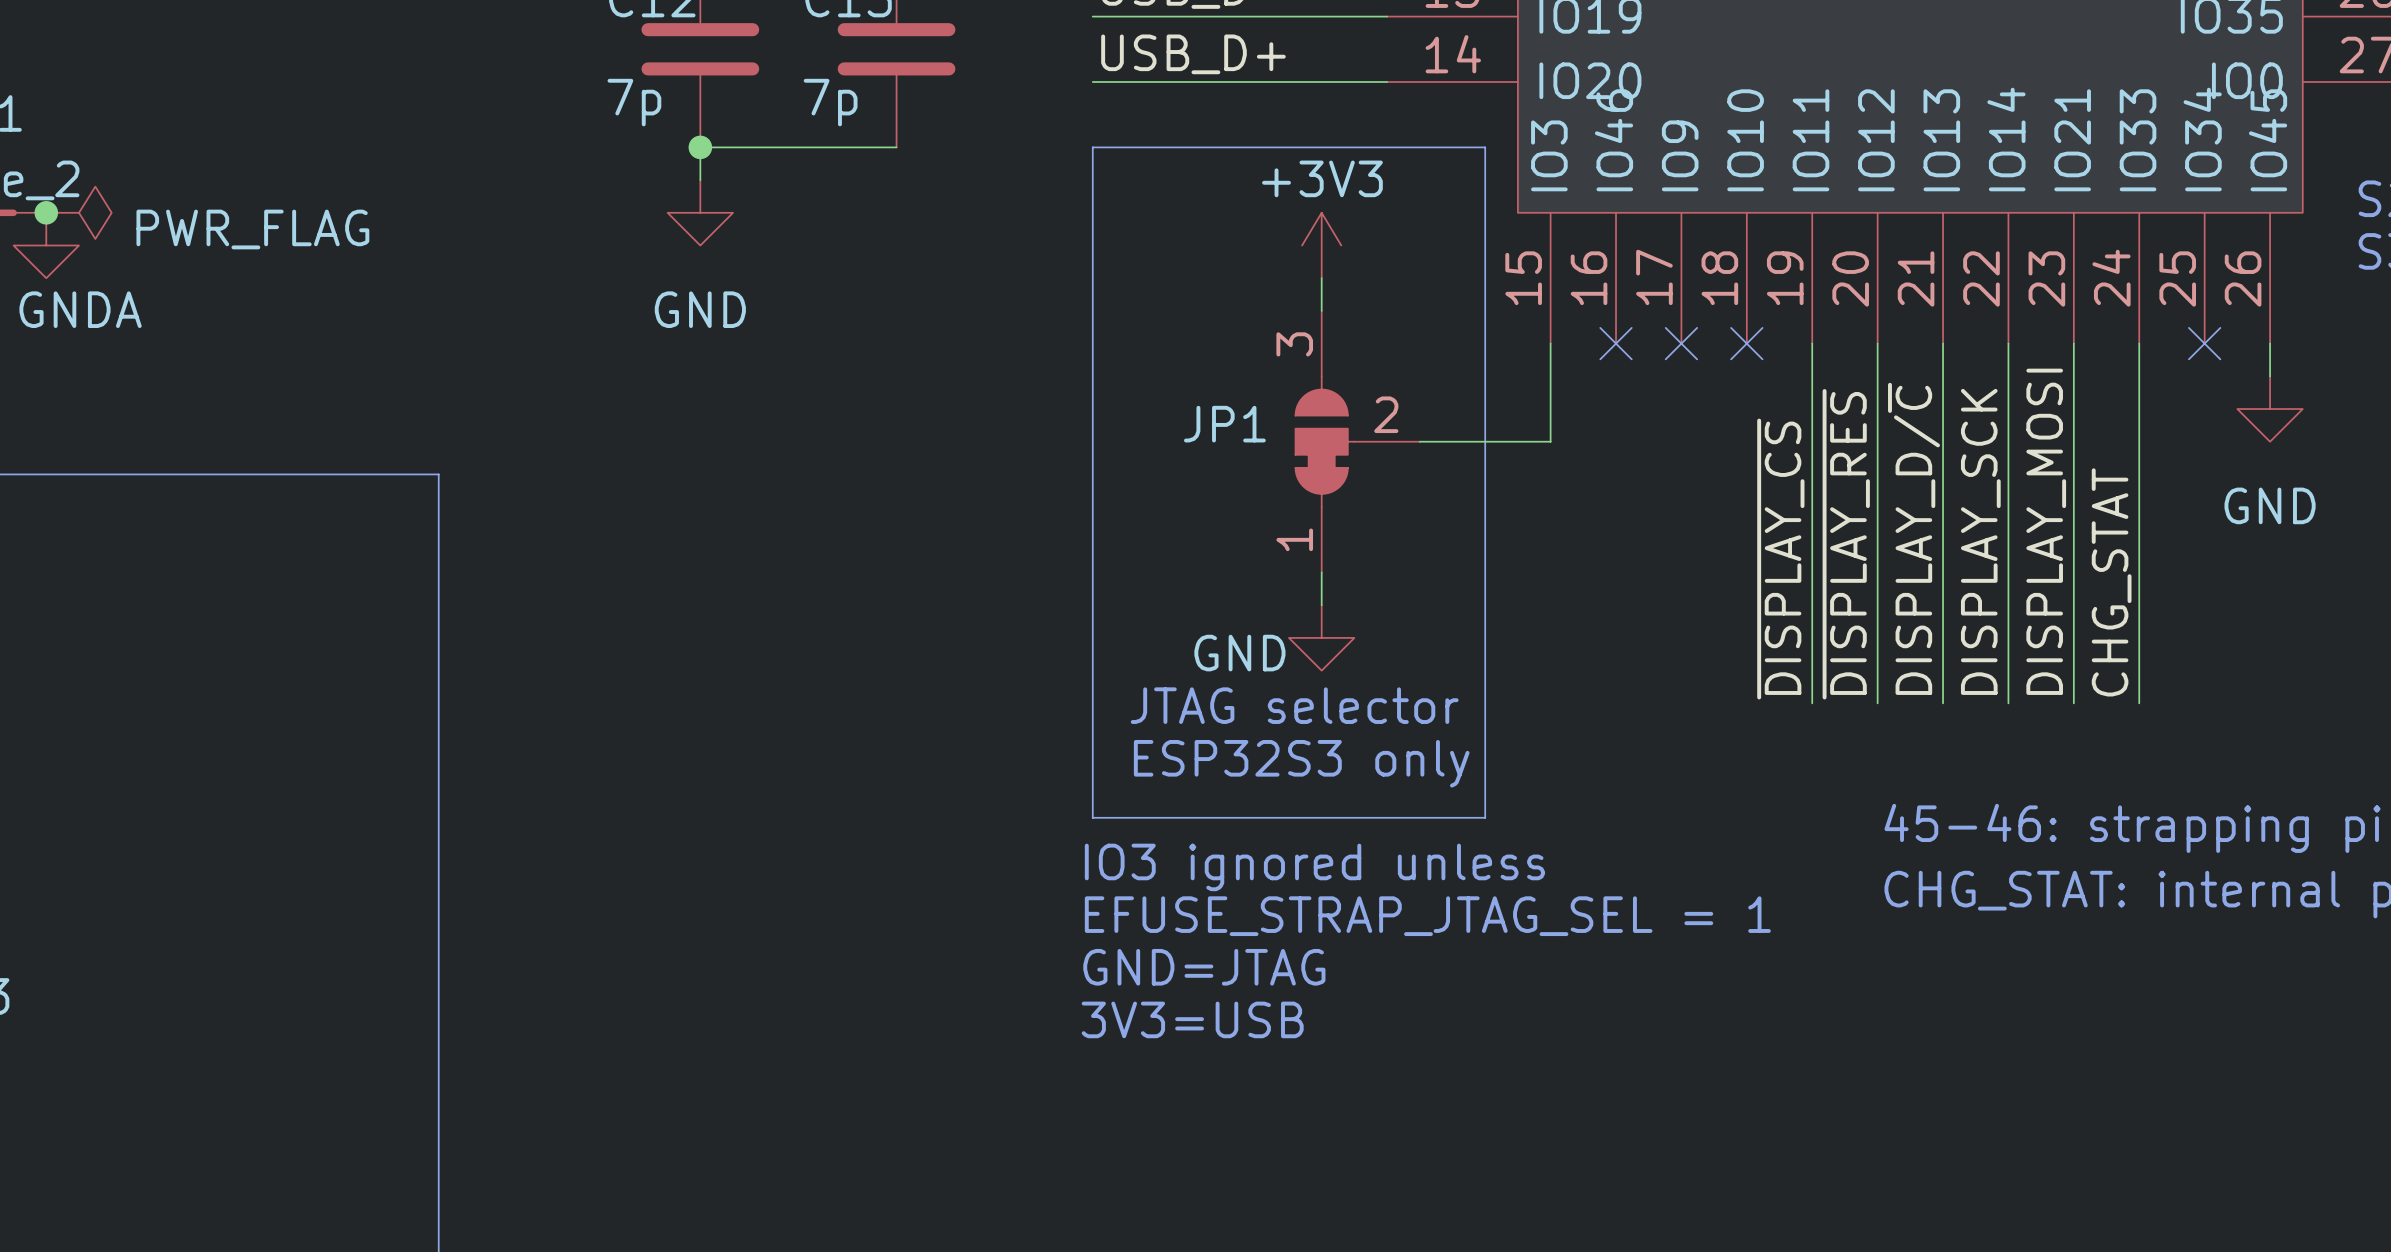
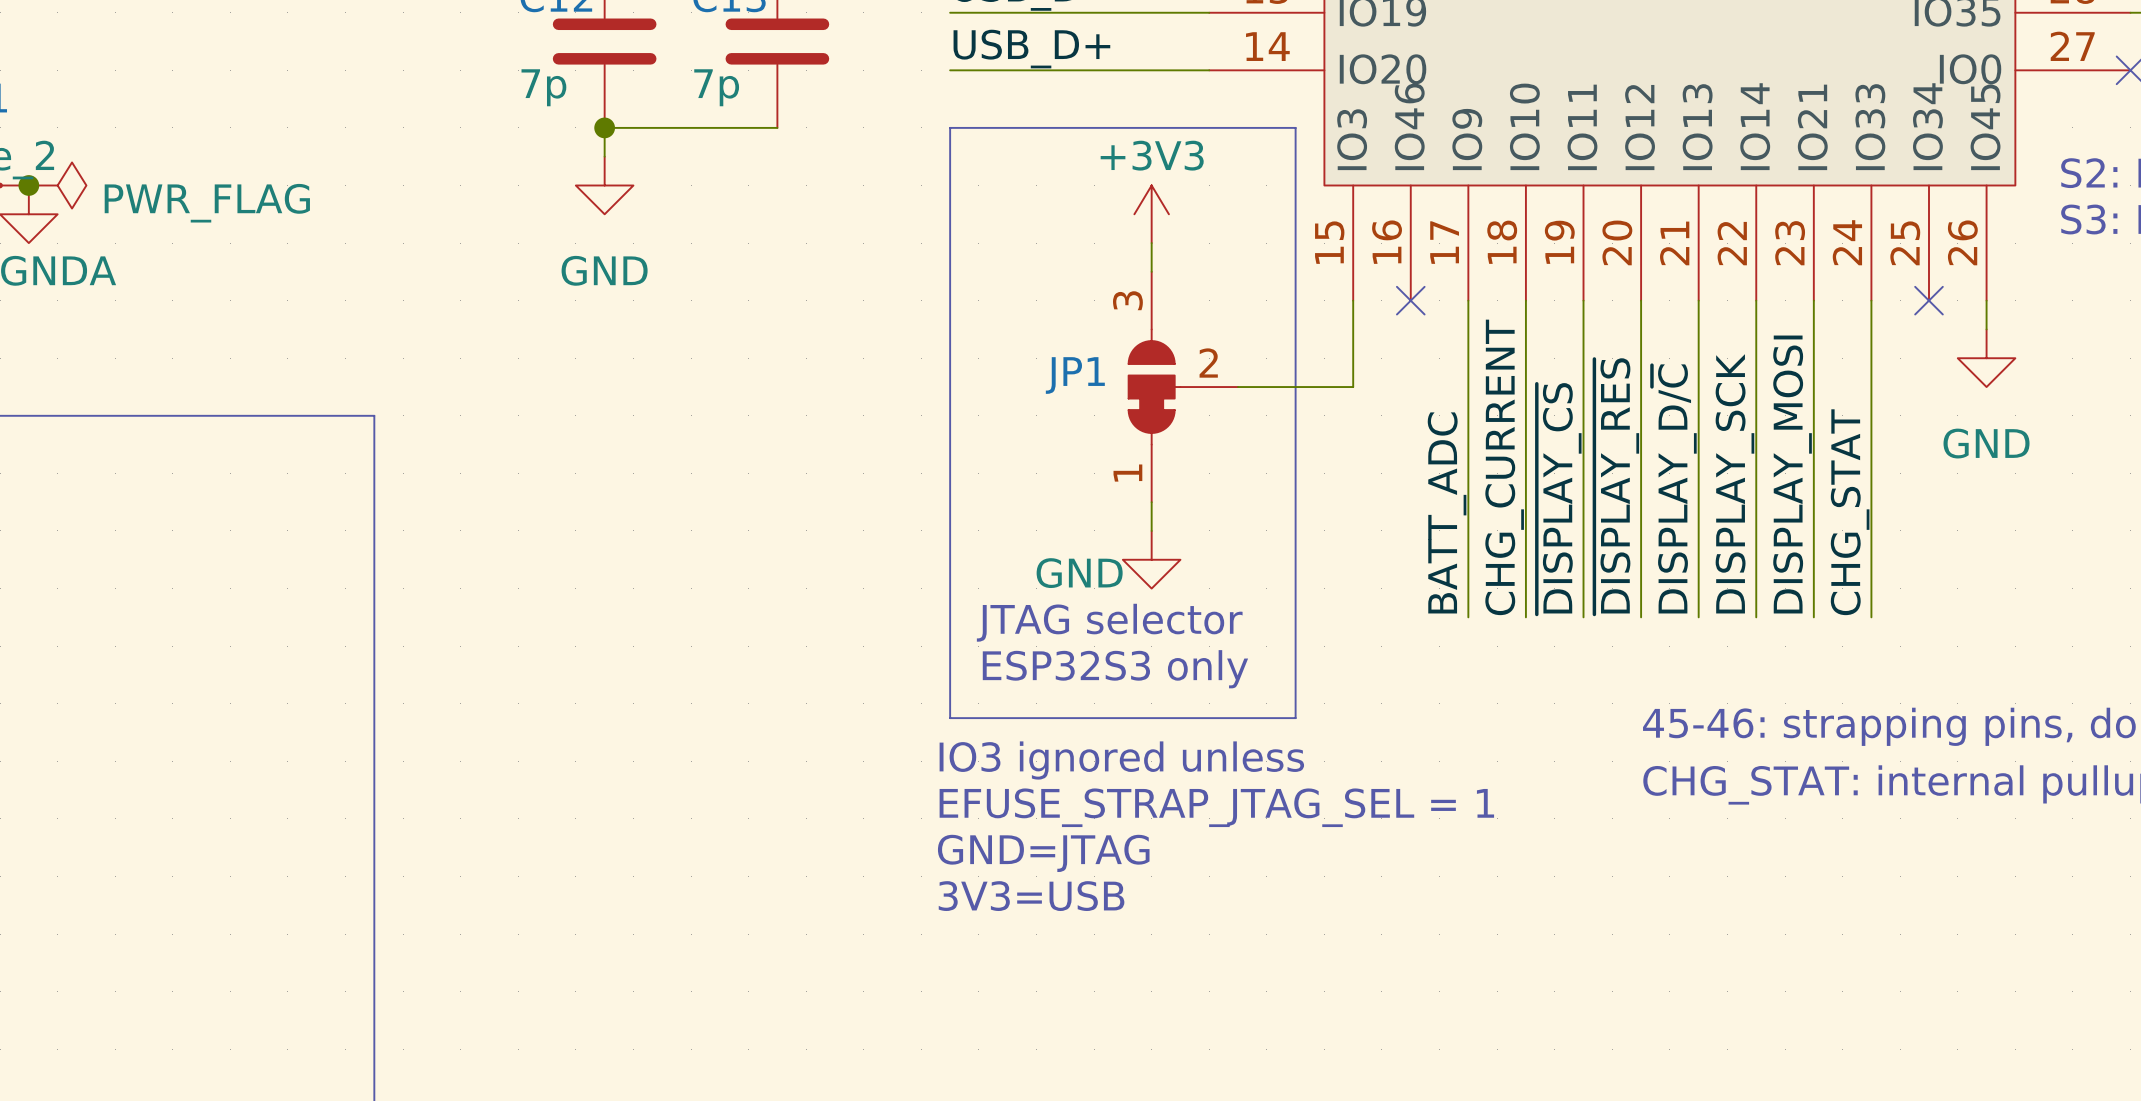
wire: none -> (1468, 300) (1468, 617)
no-connect mark: (1681, 343) -> none
wire: none -> (1525, 300) (1525, 617)
no-connect mark: (1746, 343) -> none
label: none -> CHG_CURRENT (1504, 467)
label: none -> BATT_ADC (1447, 512)

